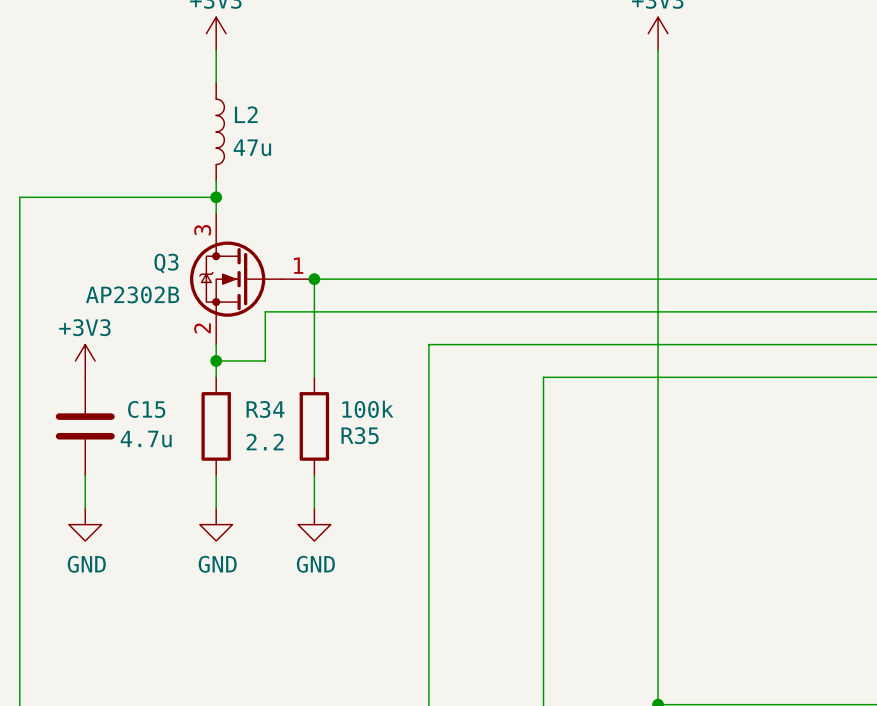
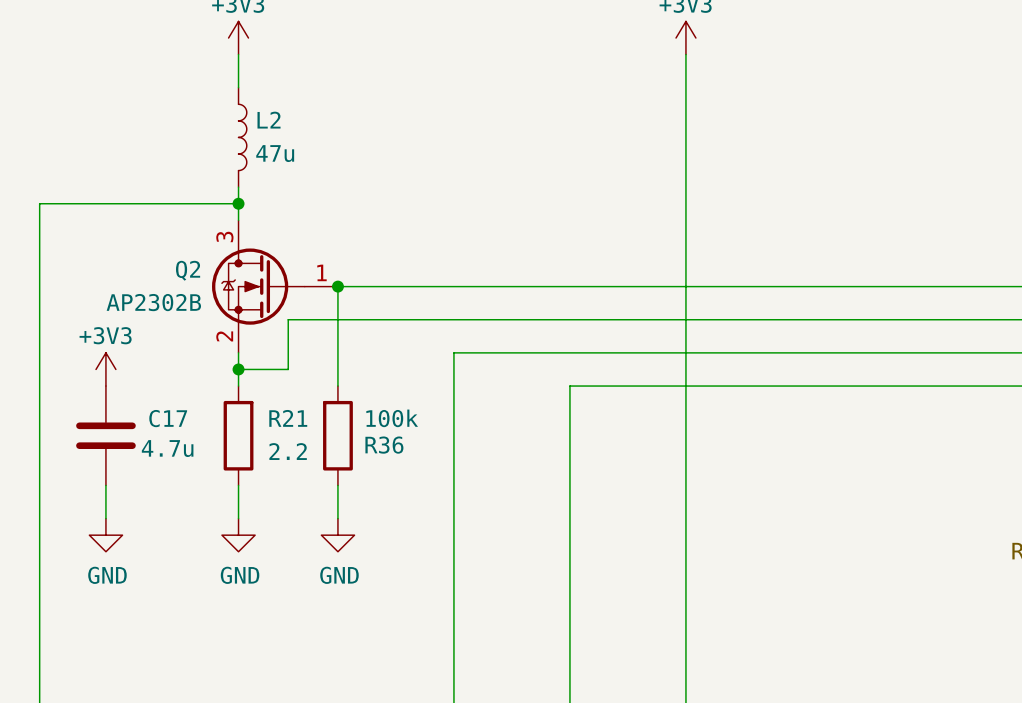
Q3 name: Q3 (166, 263) -> Q2 (188, 270)
C15 name: C15 (146, 409) -> C17 (168, 418)
R34 name: R34 (265, 409) -> R21 (288, 418)
R35 name: R35 (360, 435) -> R36 (384, 445)

